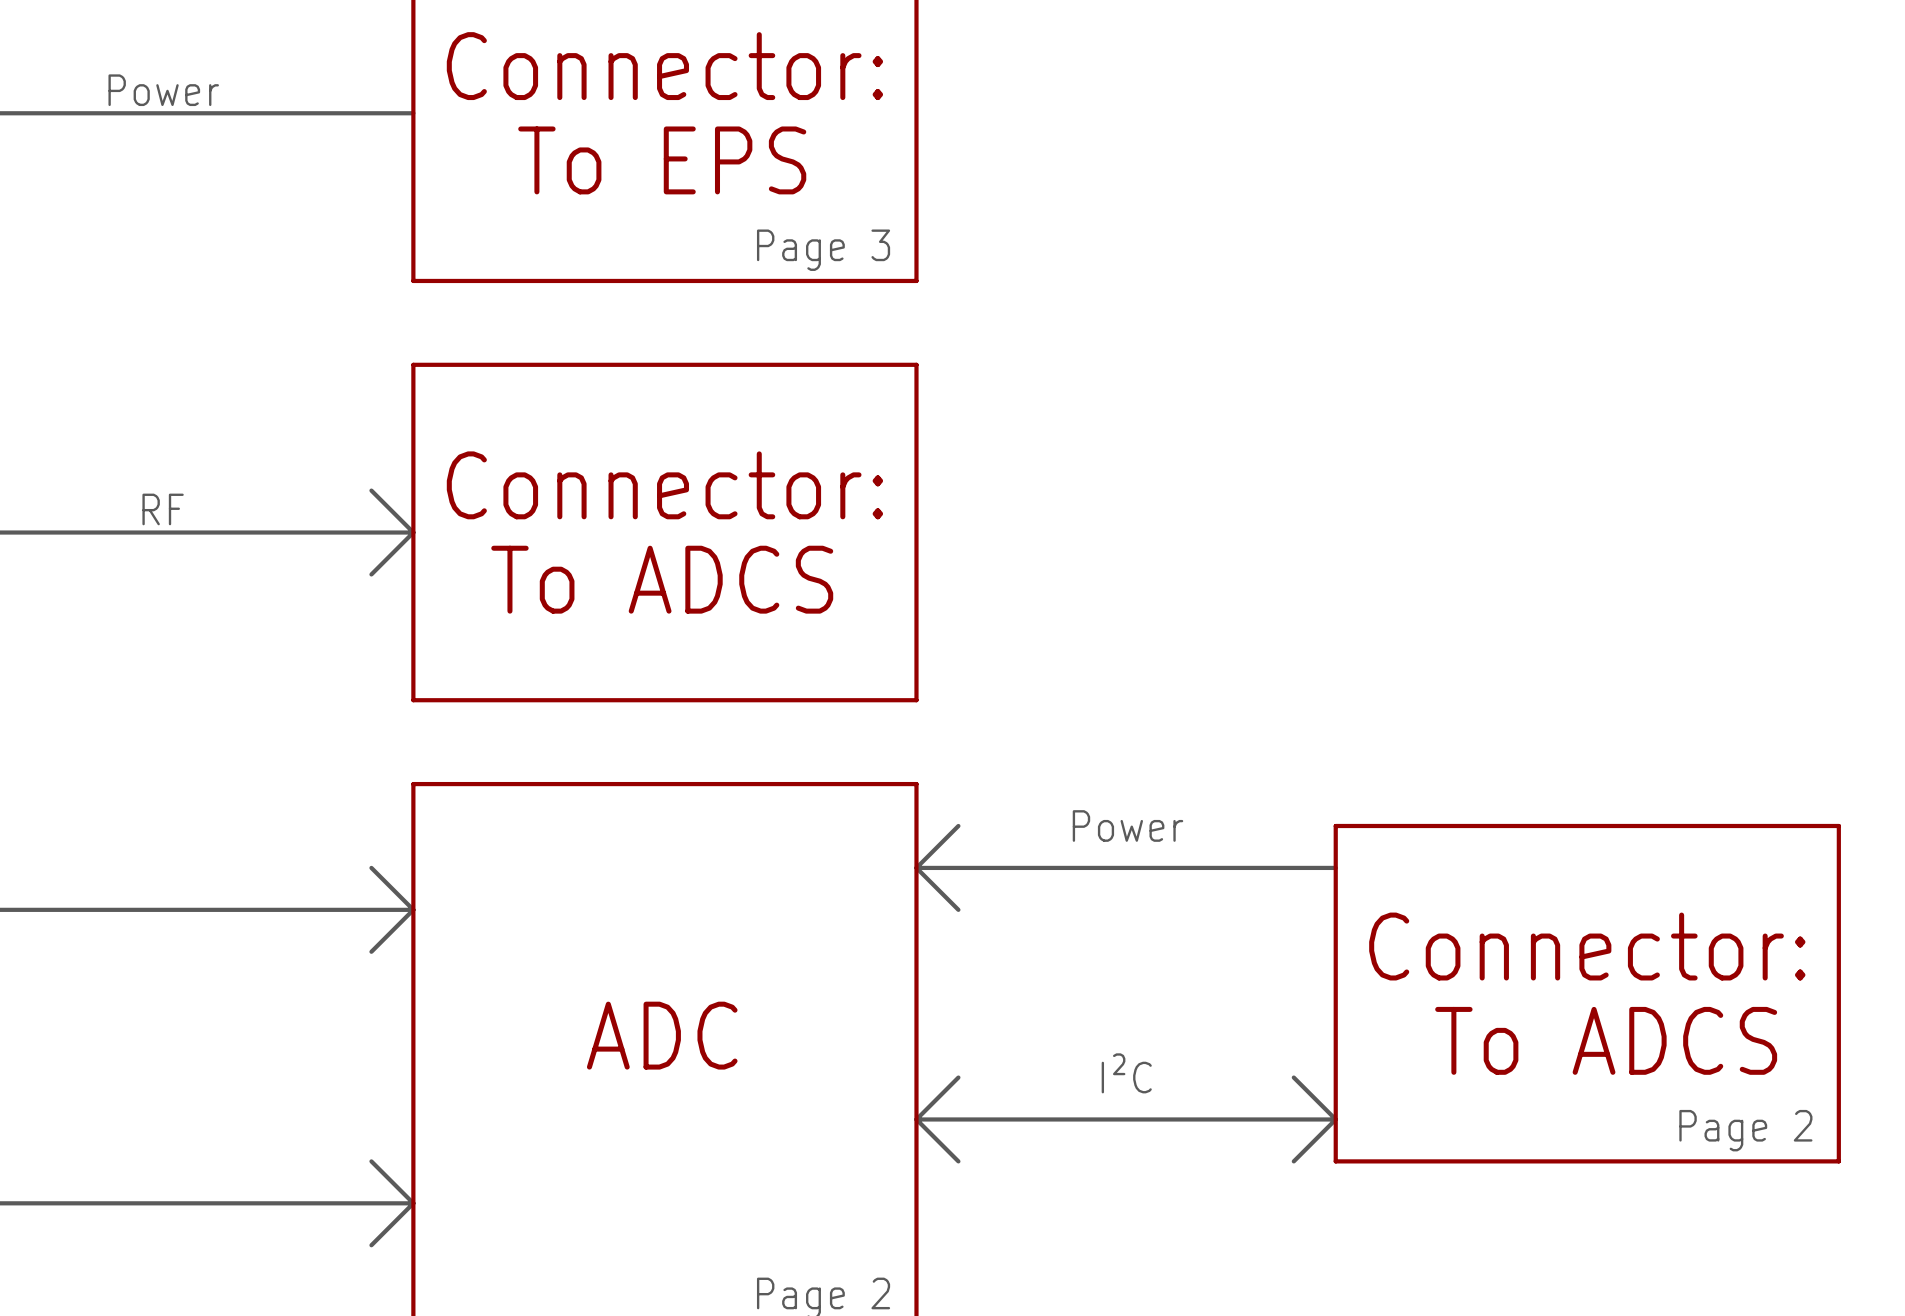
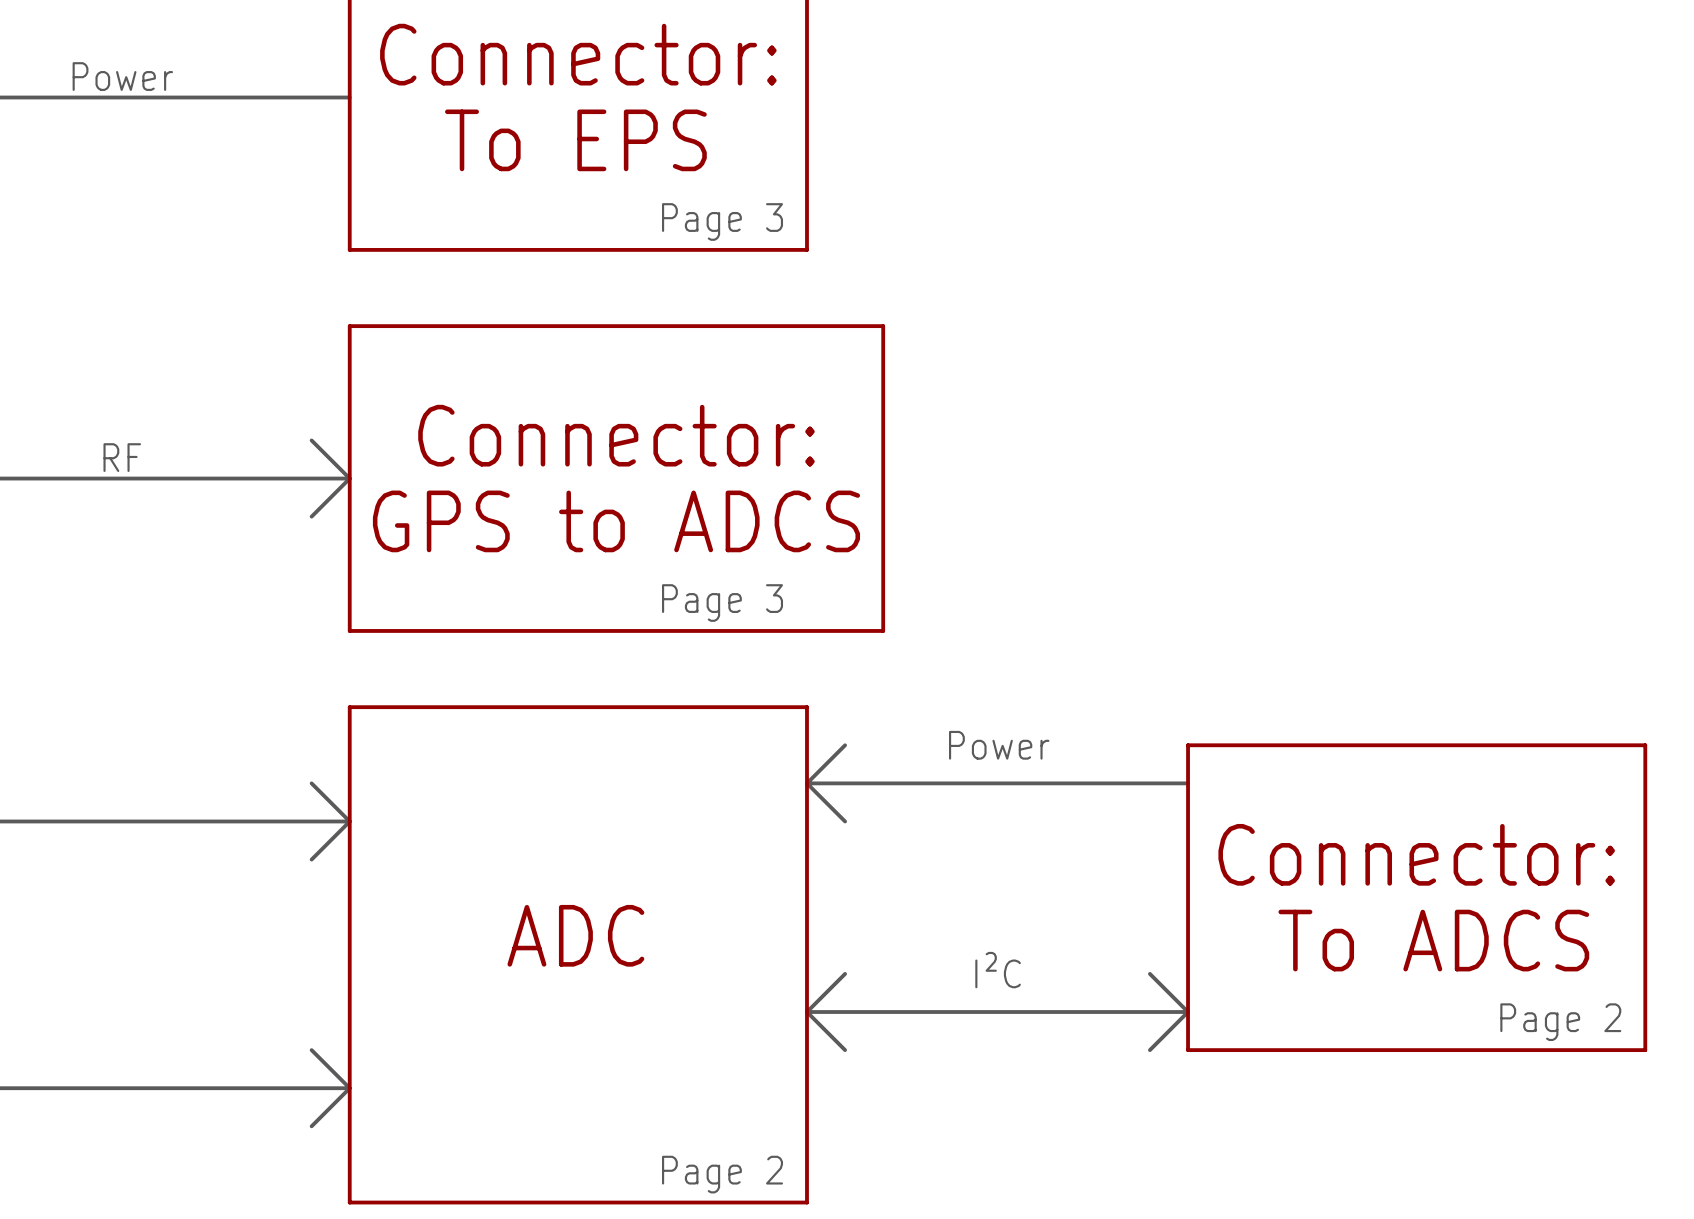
line: (916, 364) (916, 700) -> (806, 326) (883, 326) (883, 630) (806, 630)
text position: Connector: (664, 485) -> Connector: (616, 435)
text: To ADCS (662, 579) -> GPS to ADCS (616, 521)
text: none -> Page 3 (722, 603)

